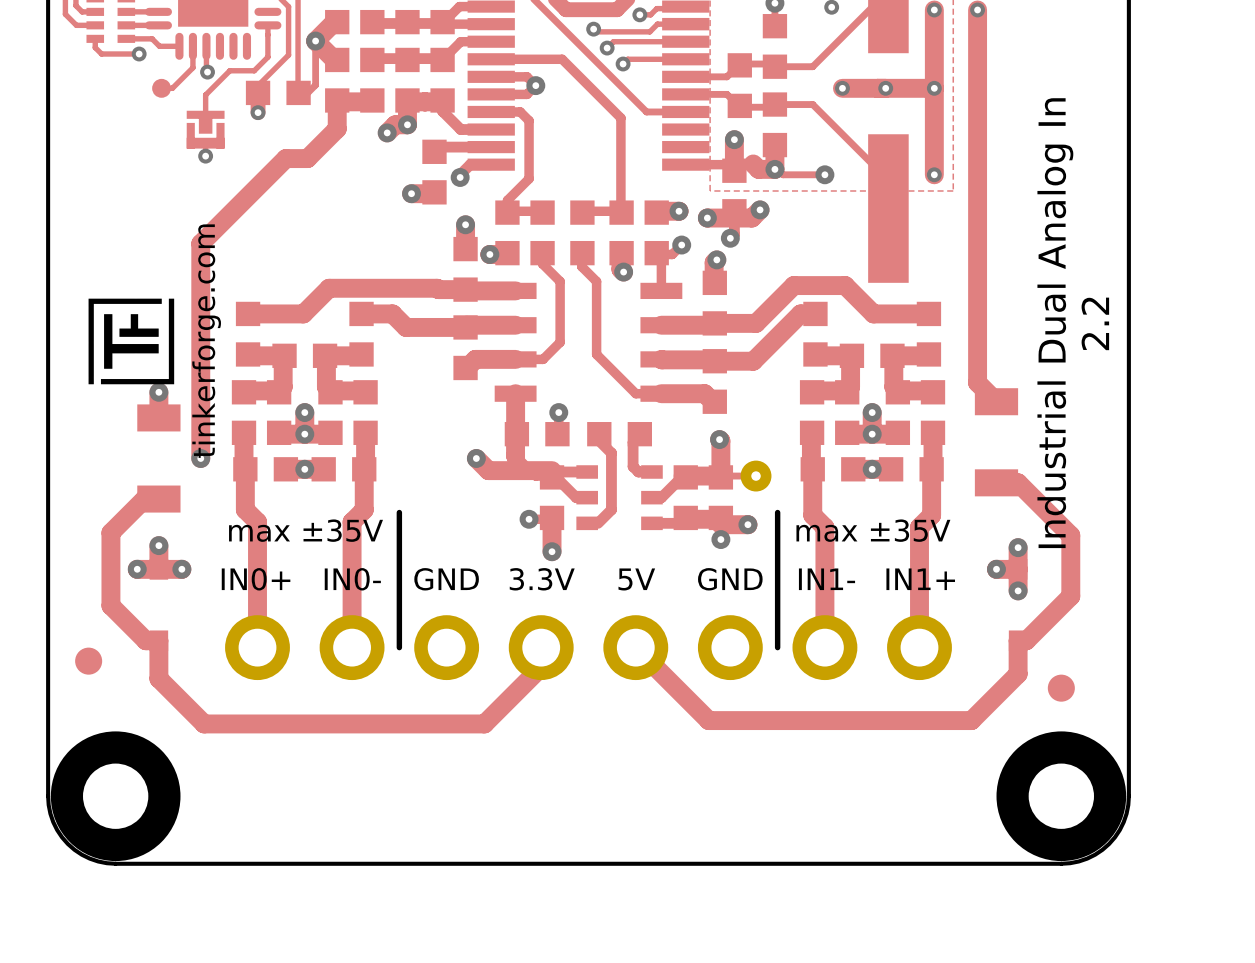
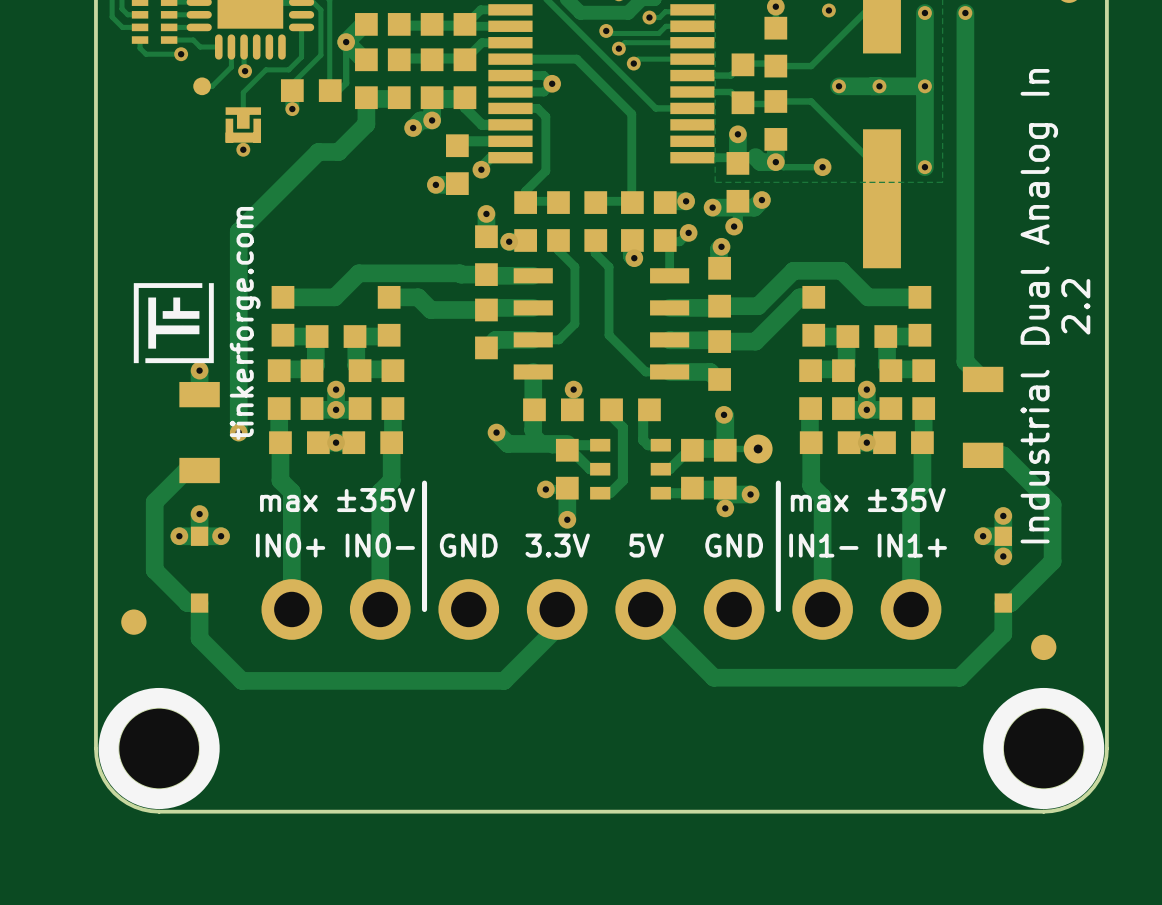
part footprint: [50, 731, 181, 862] -> [98, 687, 220, 810]
part footprint: [996, 731, 1127, 862] -> [983, 687, 1105, 810]

